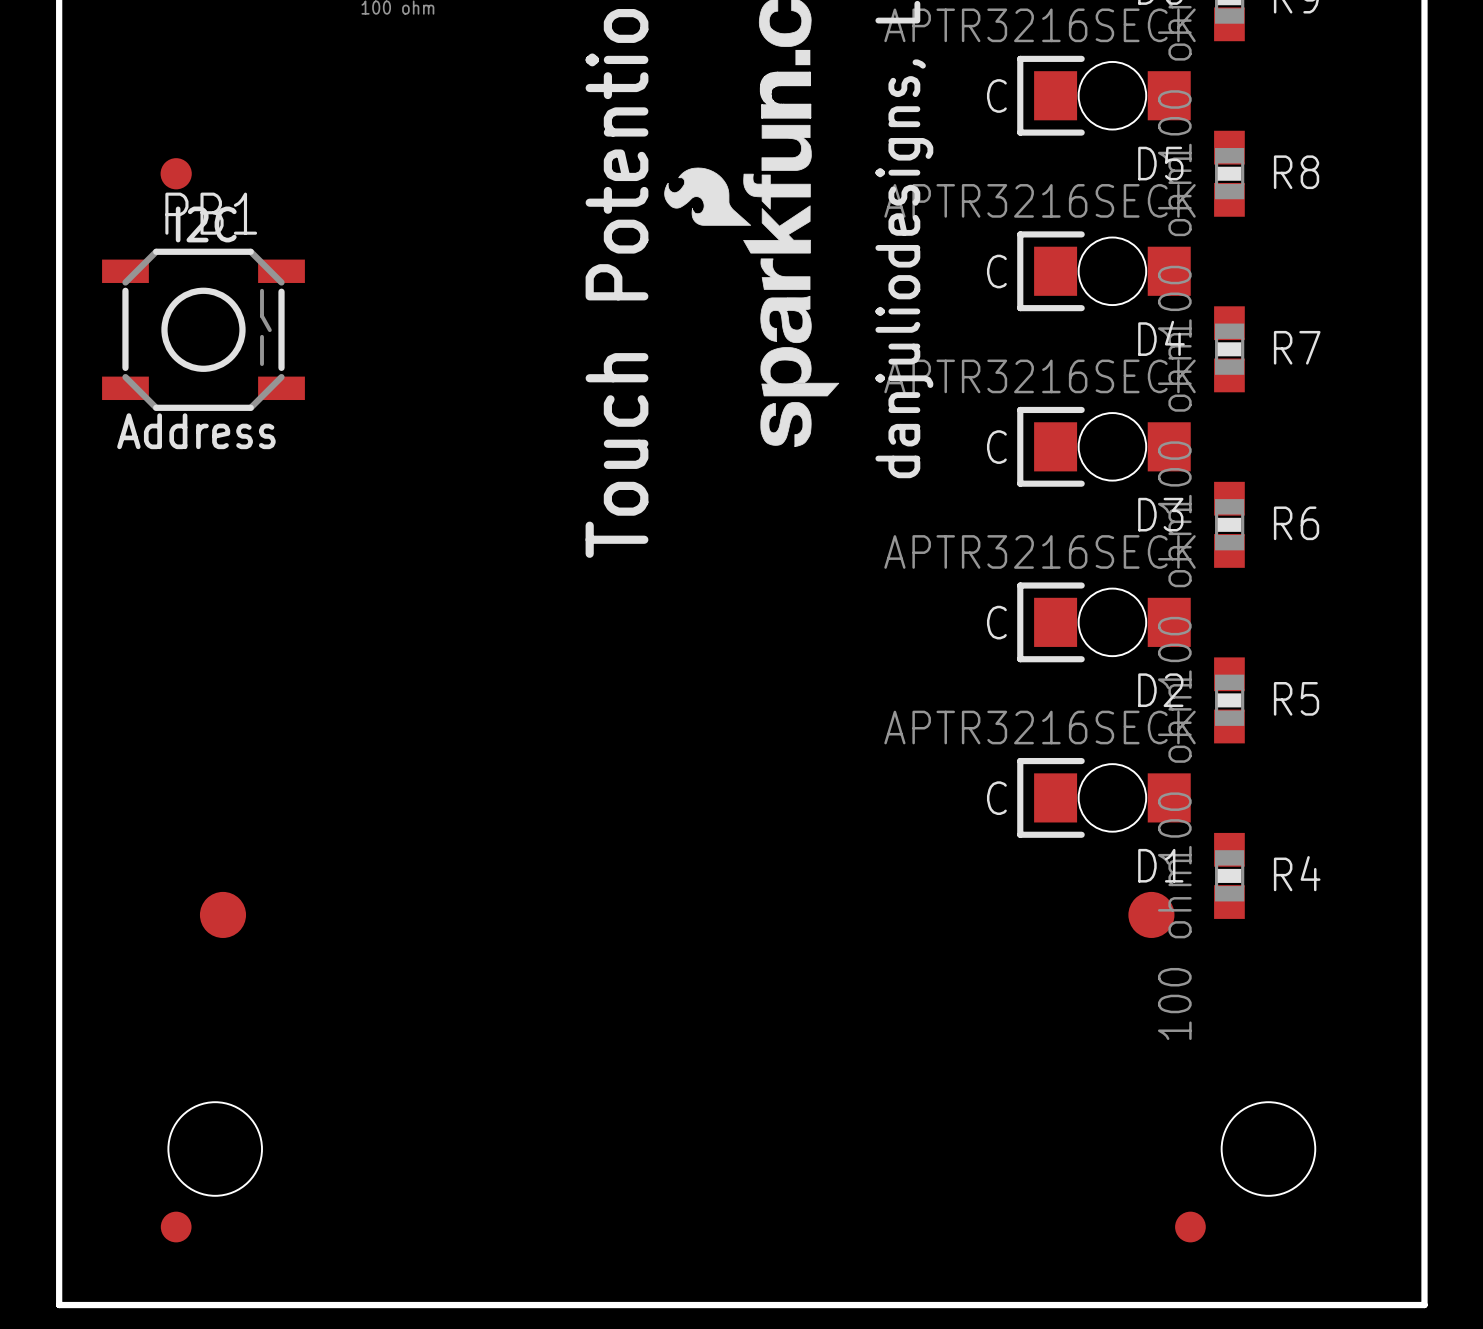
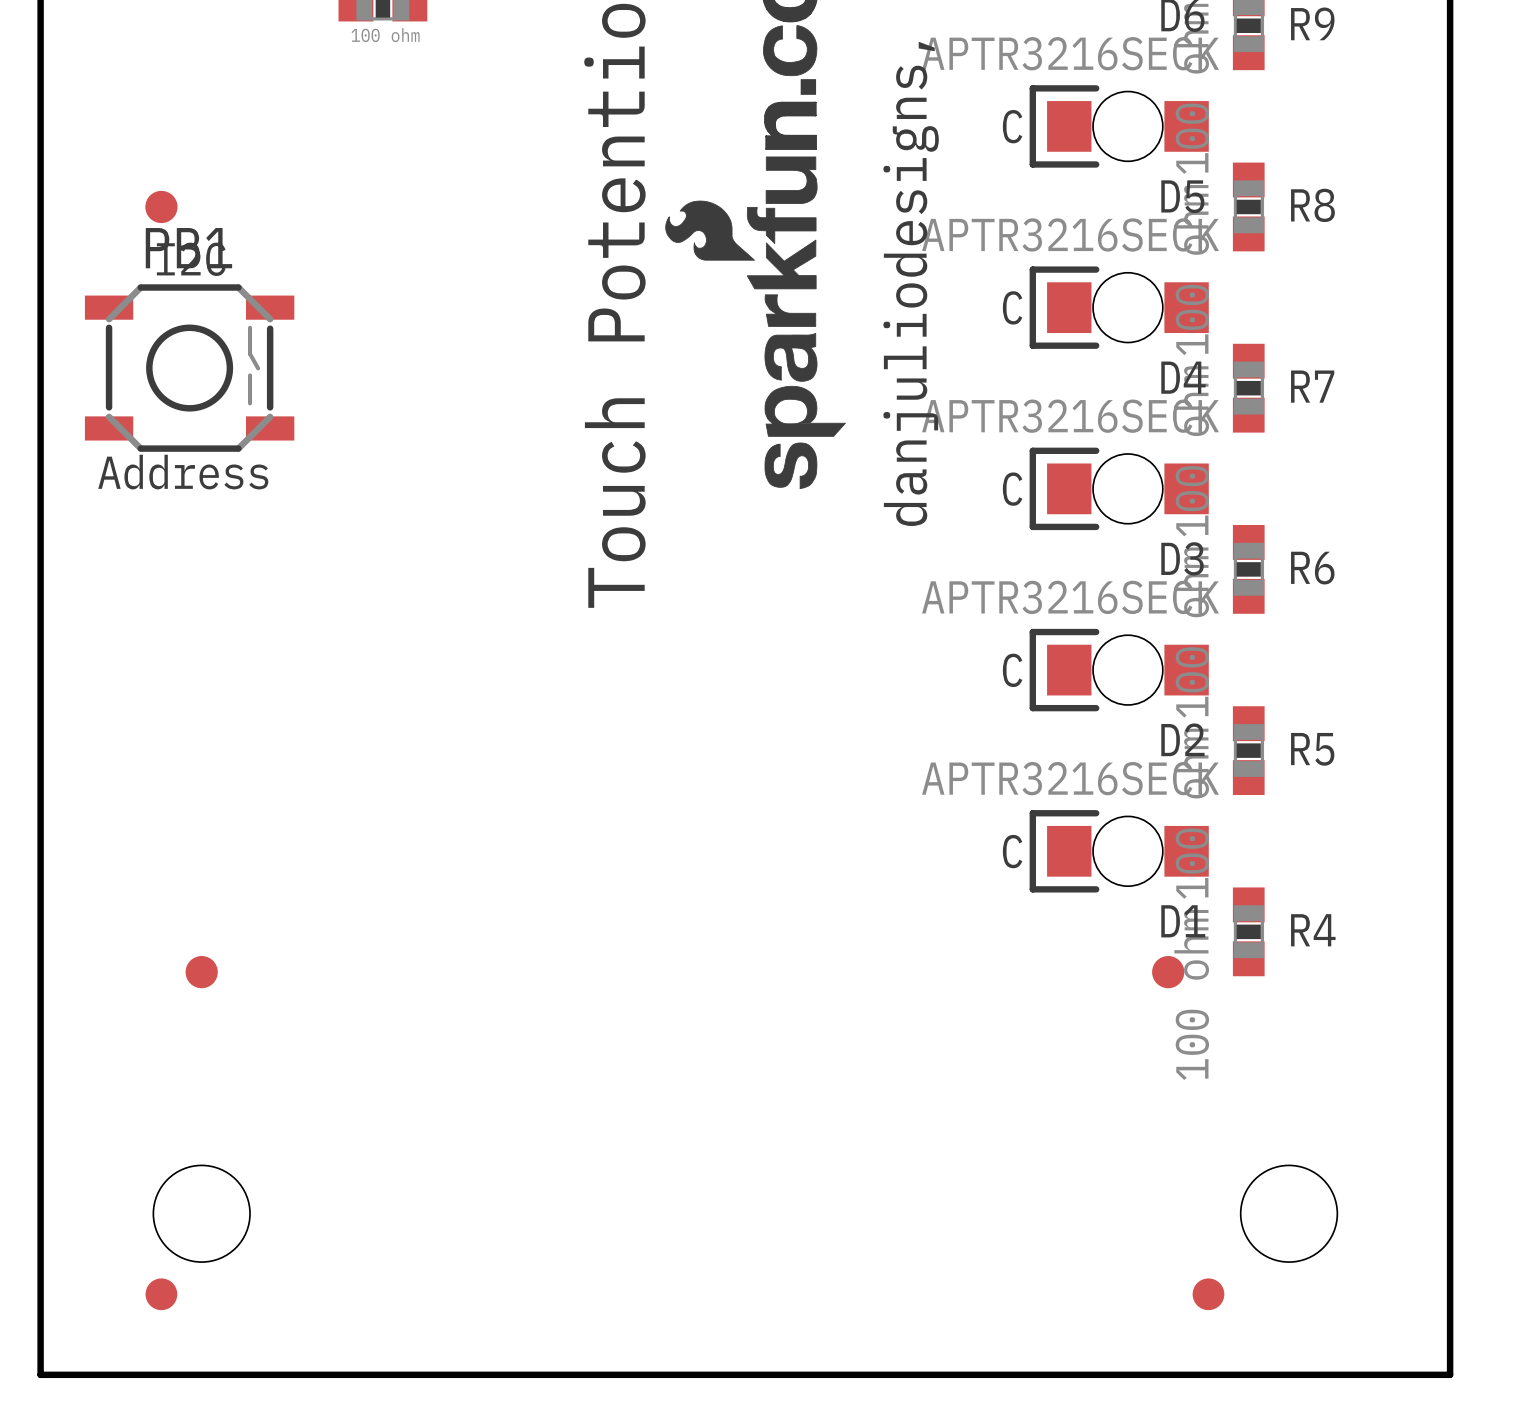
part footprint: [199, 891, 247, 938] -> [185, 956, 218, 989]
part footprint: [1128, 891, 1175, 938] -> [1152, 956, 1185, 989]

